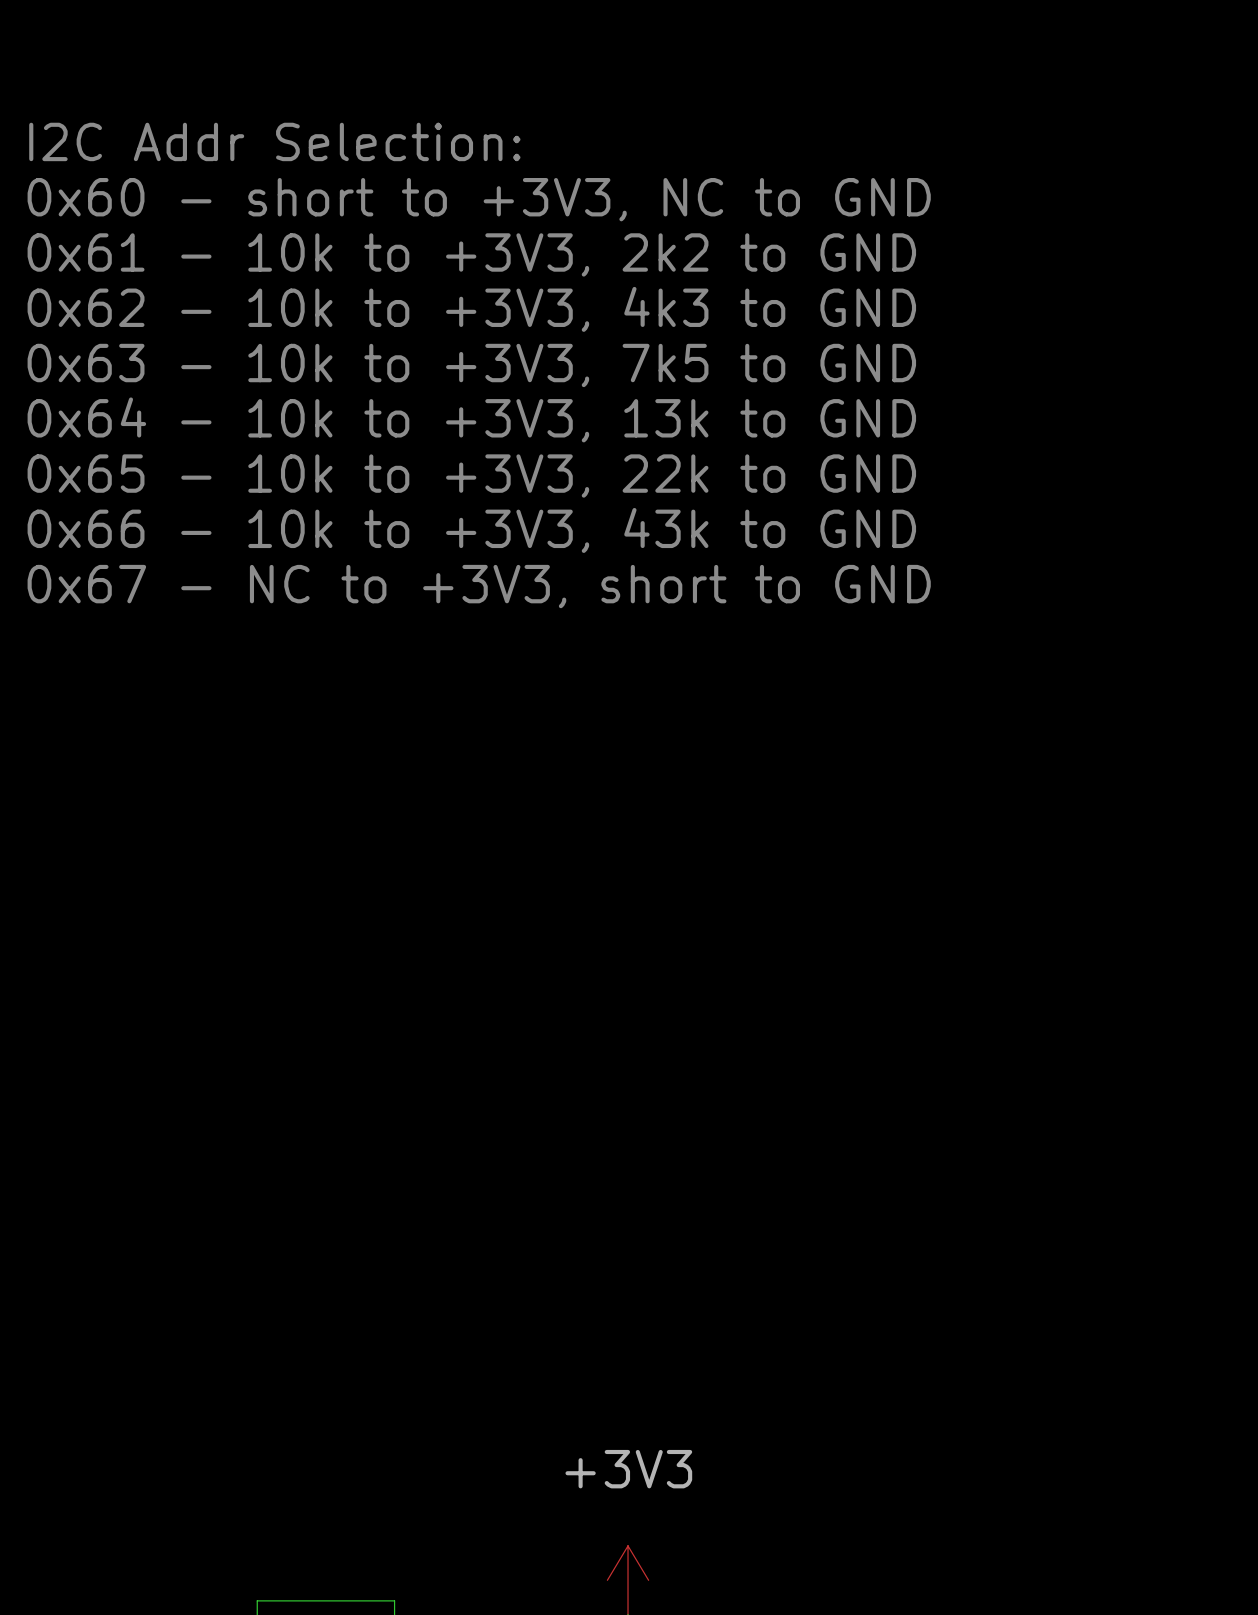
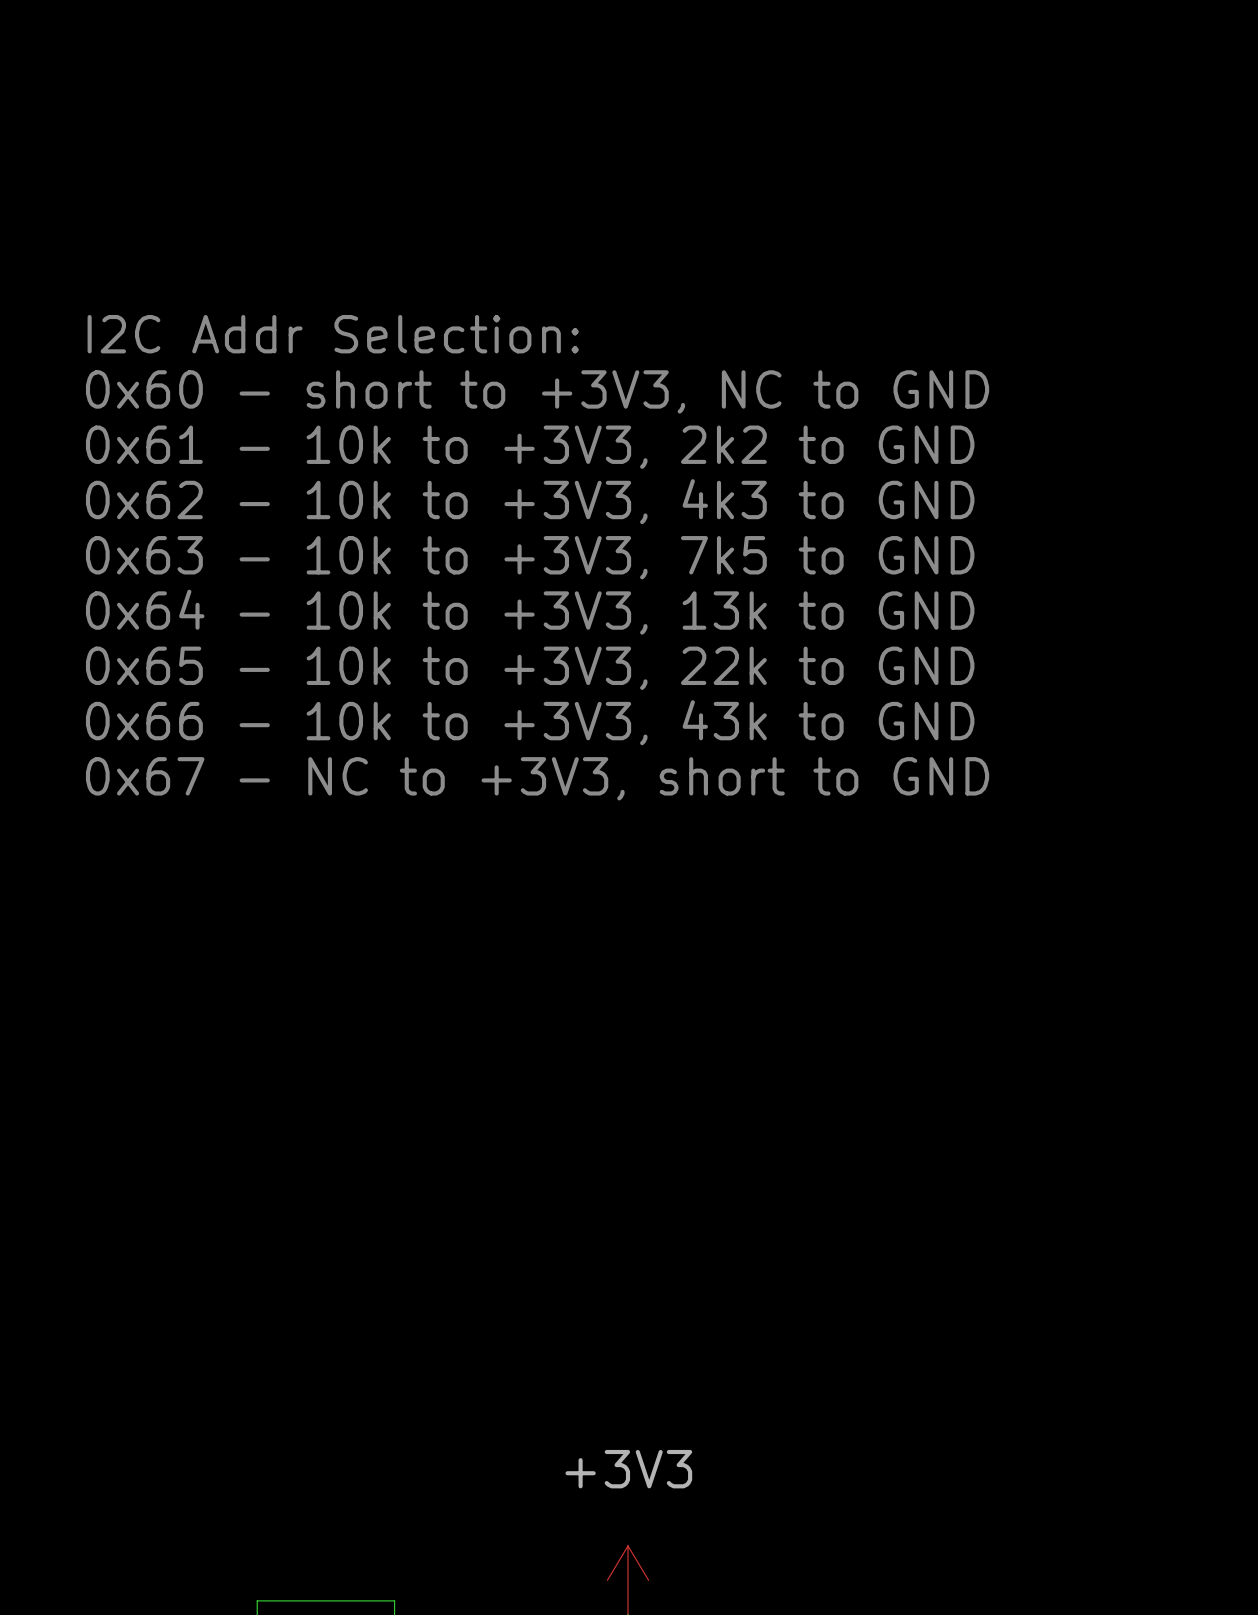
text position: I2C Addr Selection: (274, 141) -> I2C Addr Selection: (333, 334)
text position: 0x60 - short to +3V3, NC to GND (479, 199) -> 0x60 - short to +3V3, NC to GND (537, 391)
text position: 0x61 - 10k to +3V3, 2k2 to GND (471, 254) -> 0x61 - 10k to +3V3, 2k2 to GND (530, 447)
text position: 0x62 - 10k to +3V3, 4k3 to GND (471, 309) -> 0x62 - 10k to +3V3, 4k3 to GND (530, 501)
text position: 0x63 - 10k to +3V3, 7k5 to GND (471, 365) -> 0x63 - 10k to +3V3, 7k5 to GND (530, 557)
text position: 0x64 - 10k to +3V3, 13k to GND (471, 419) -> 0x64 - 10k to +3V3, 13k to GND (530, 612)
text position: 0x65 - 10k to +3V3, 22k to GND (471, 476) -> 0x65 - 10k to +3V3, 22k to GND (530, 668)
text position: 0x66 - 10k to +3V3, 43k to GND (471, 530) -> 0x66 - 10k to +3V3, 43k to GND (530, 722)
text position: 0x67 - NC to +3V3, short to GND (479, 586) -> 0x67 - NC to +3V3, short to GND (537, 778)

